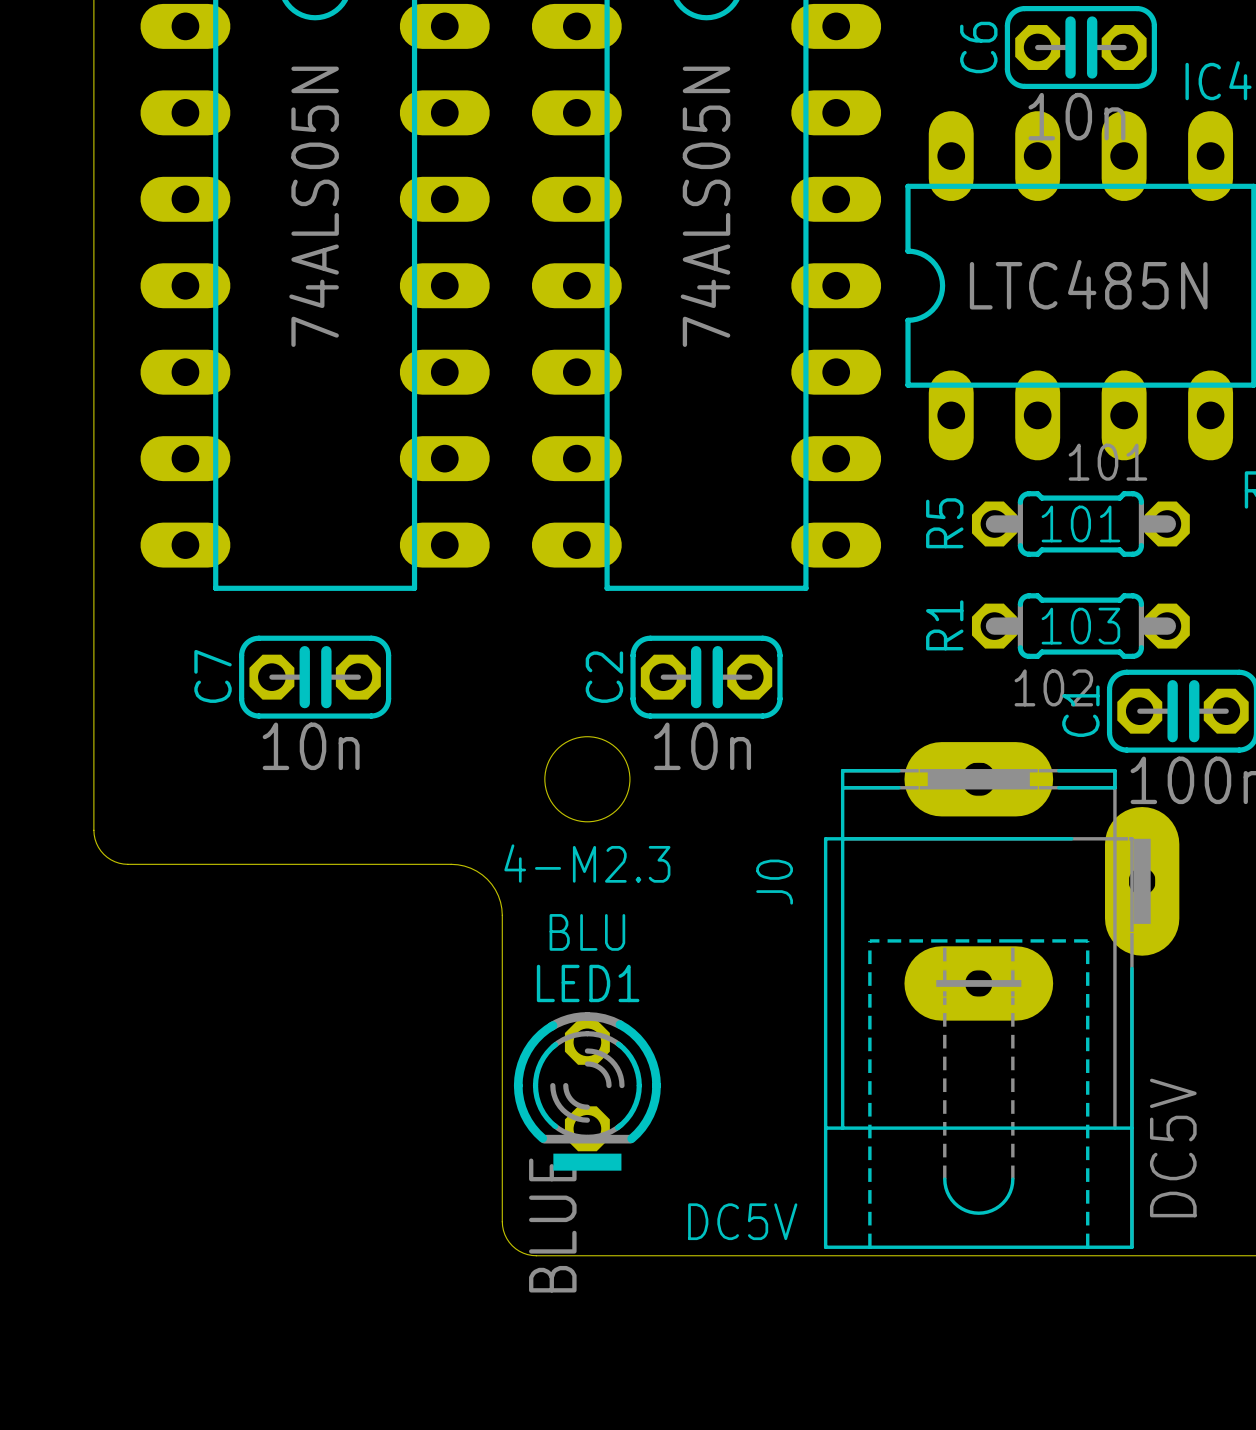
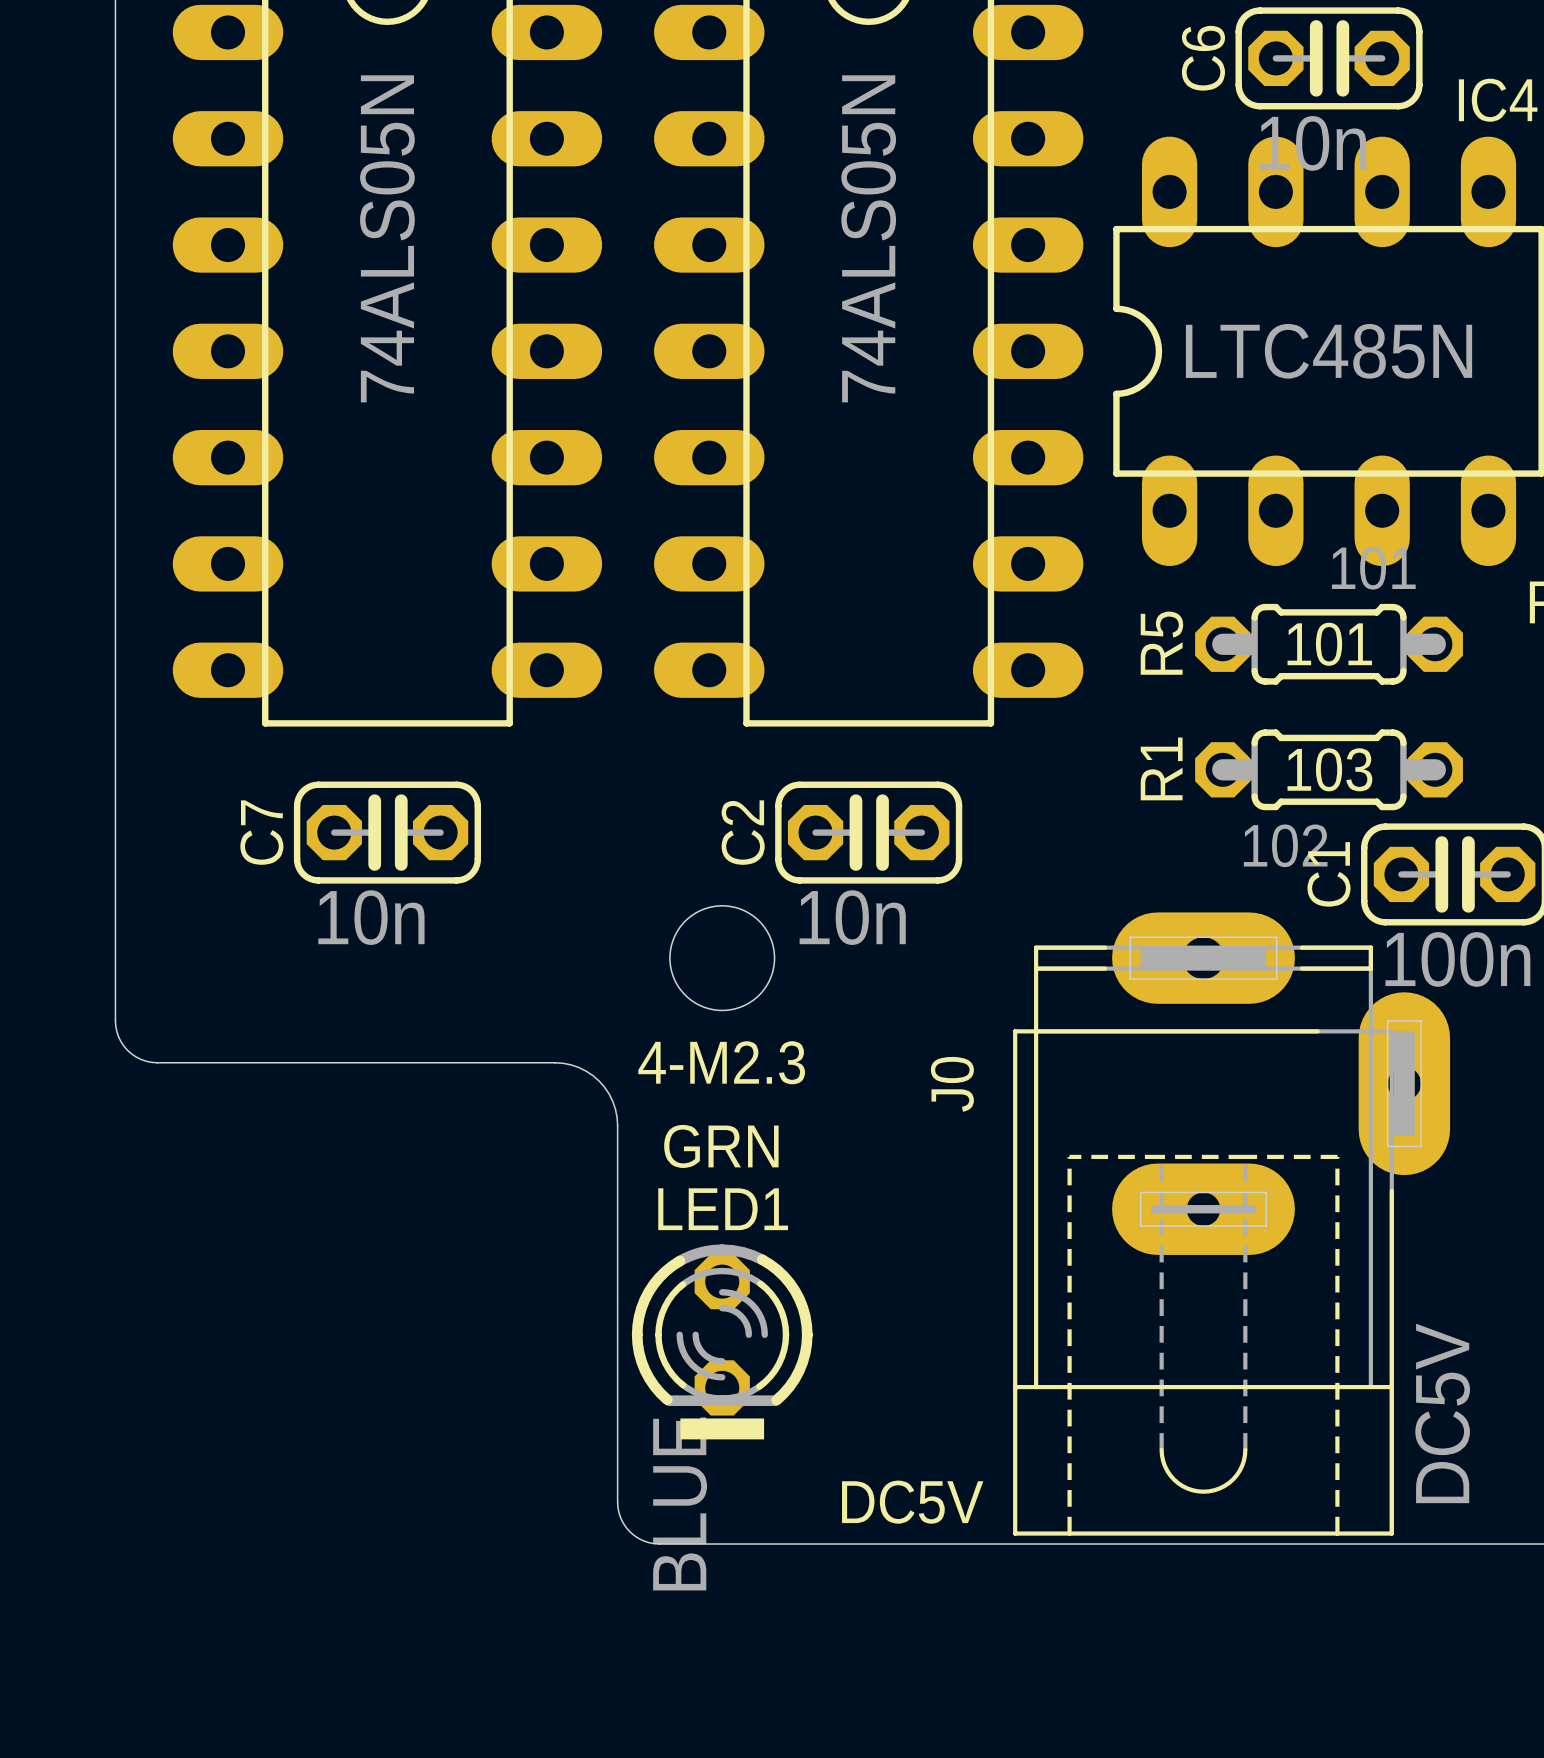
text: BLU (587, 932) -> GRN (721, 1146)

